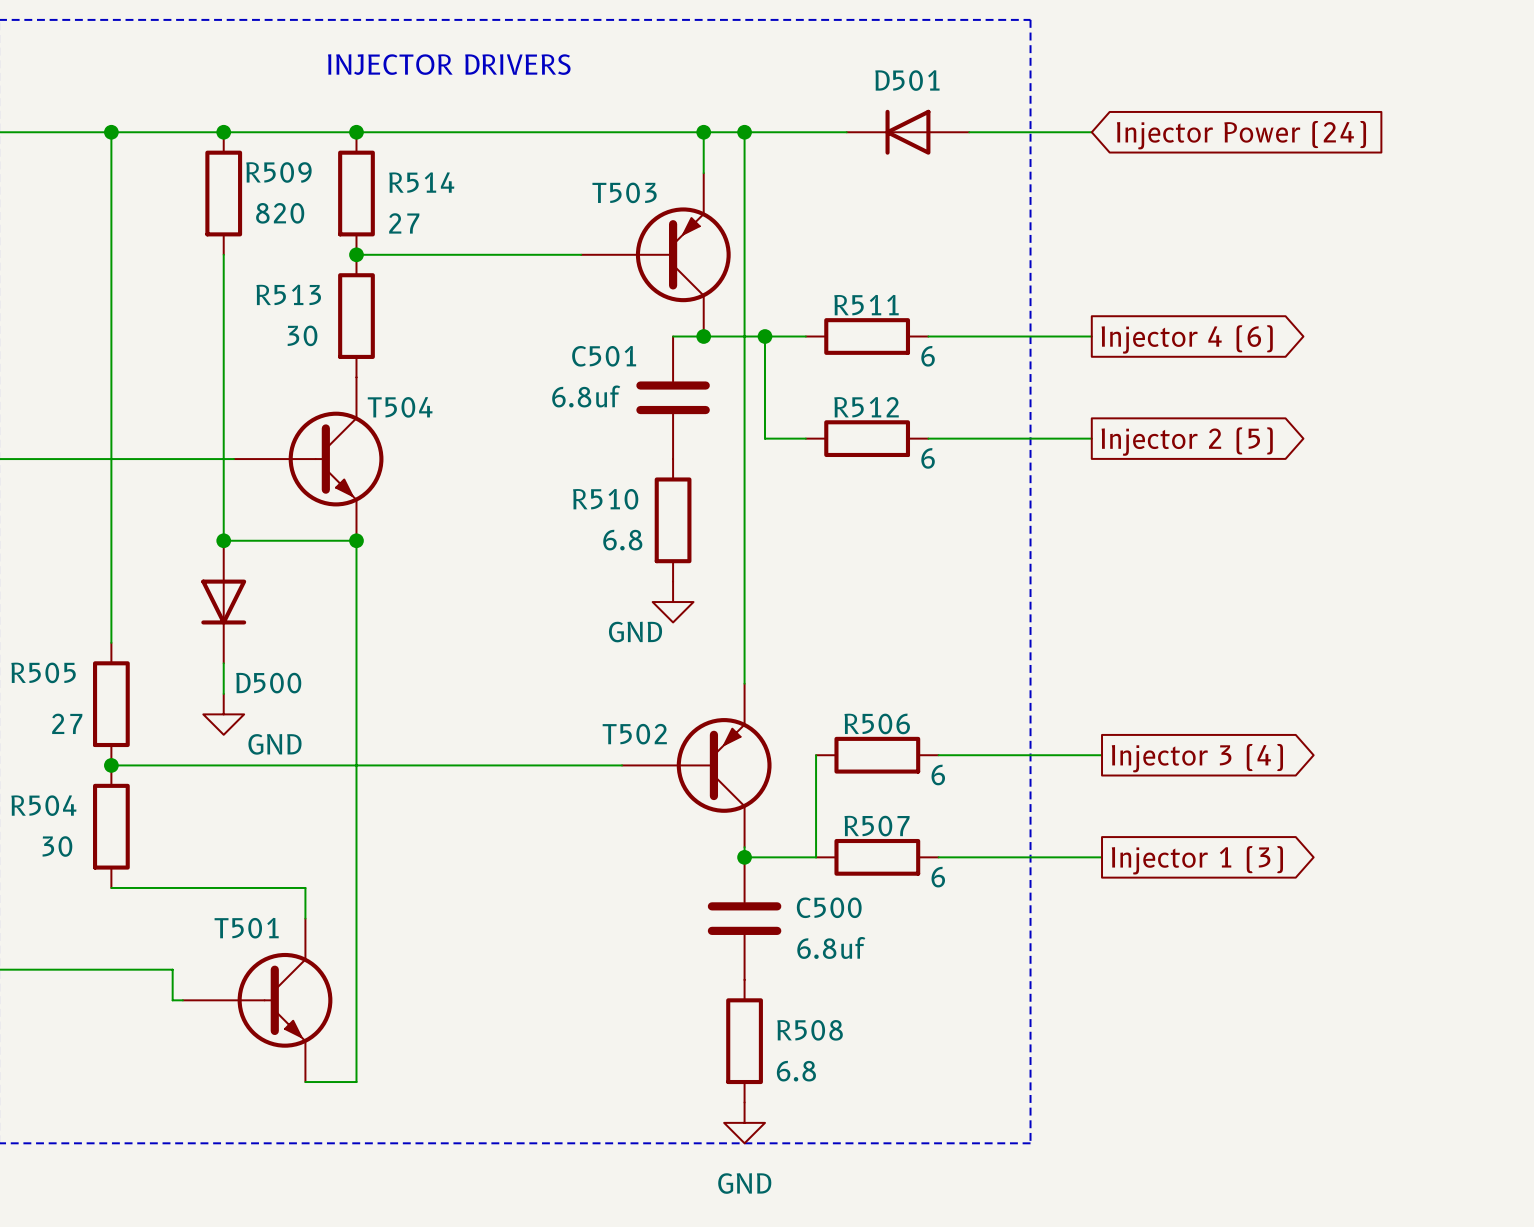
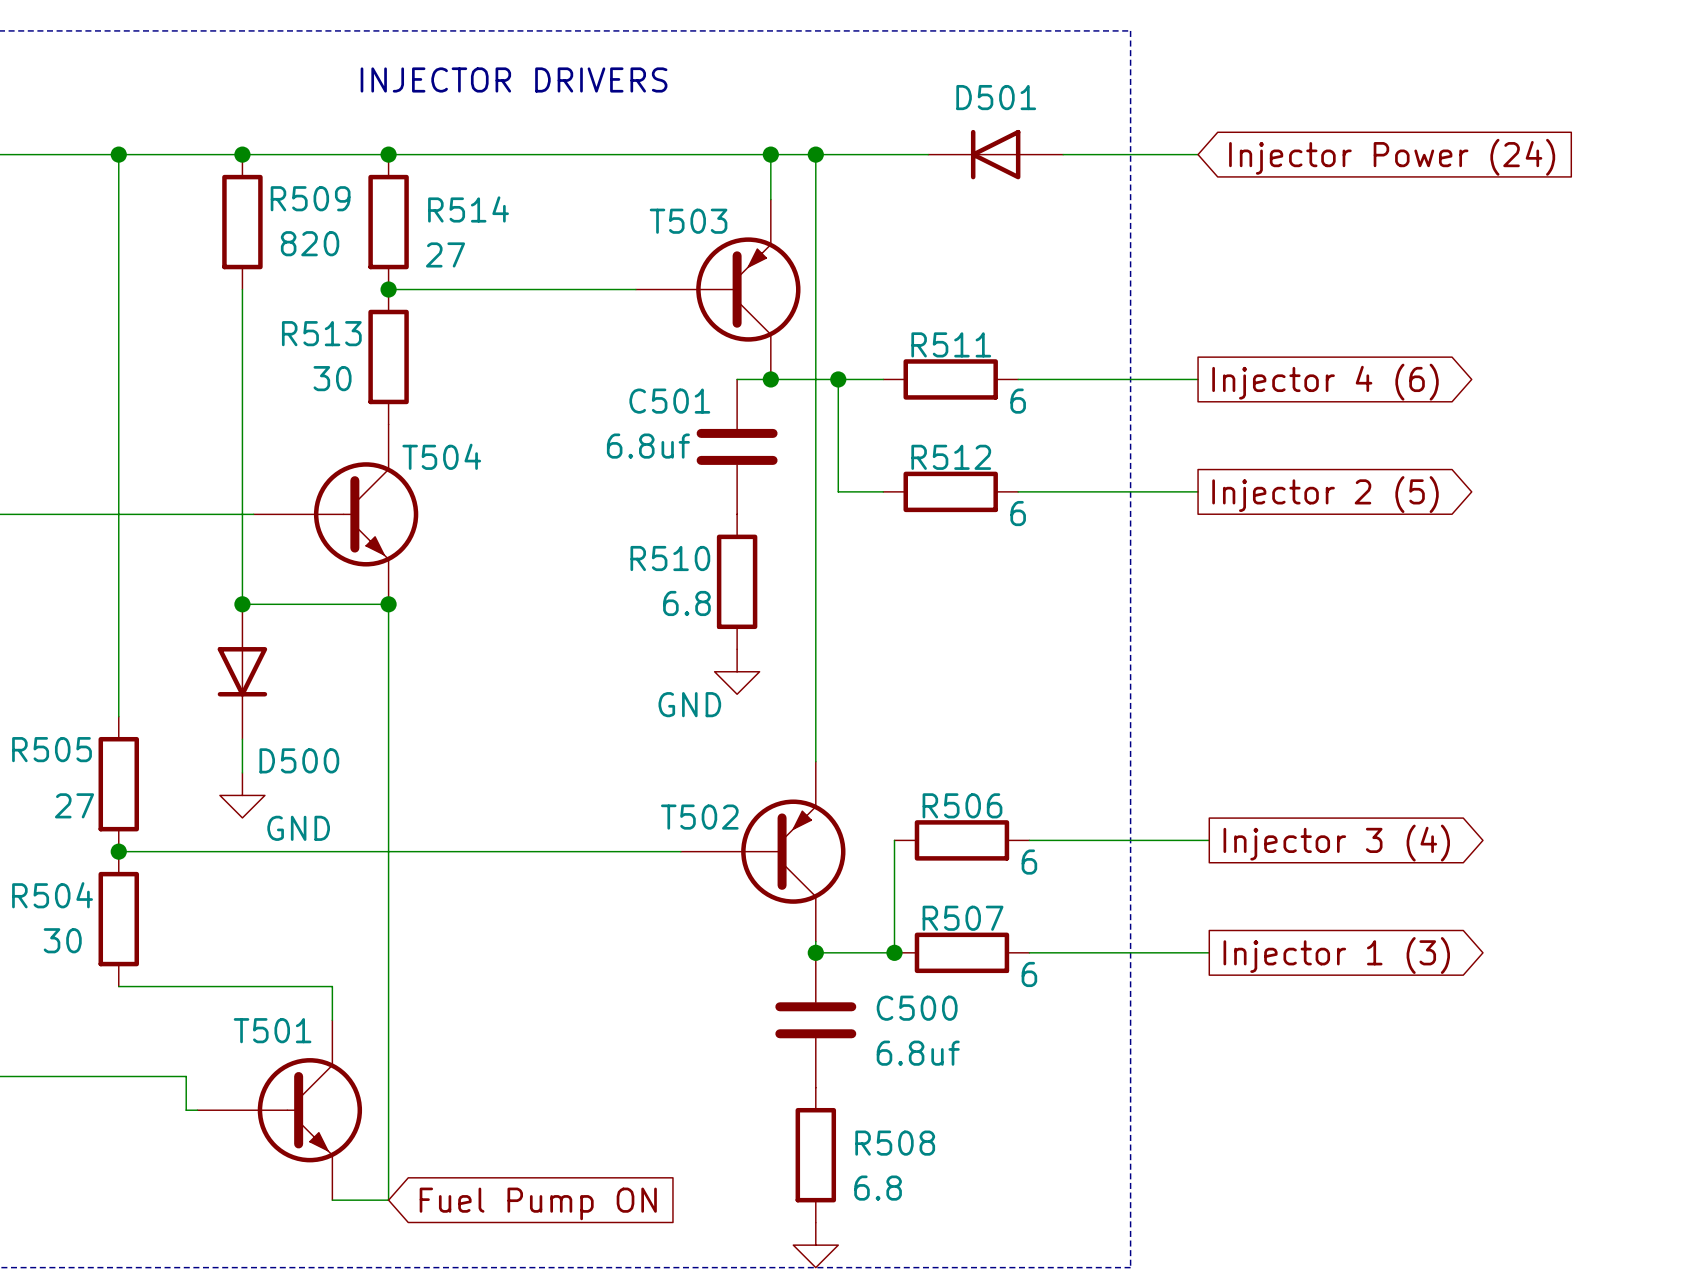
junction: none -> (894, 952)
global label: none -> Fuel Pump ON (538, 1203)

